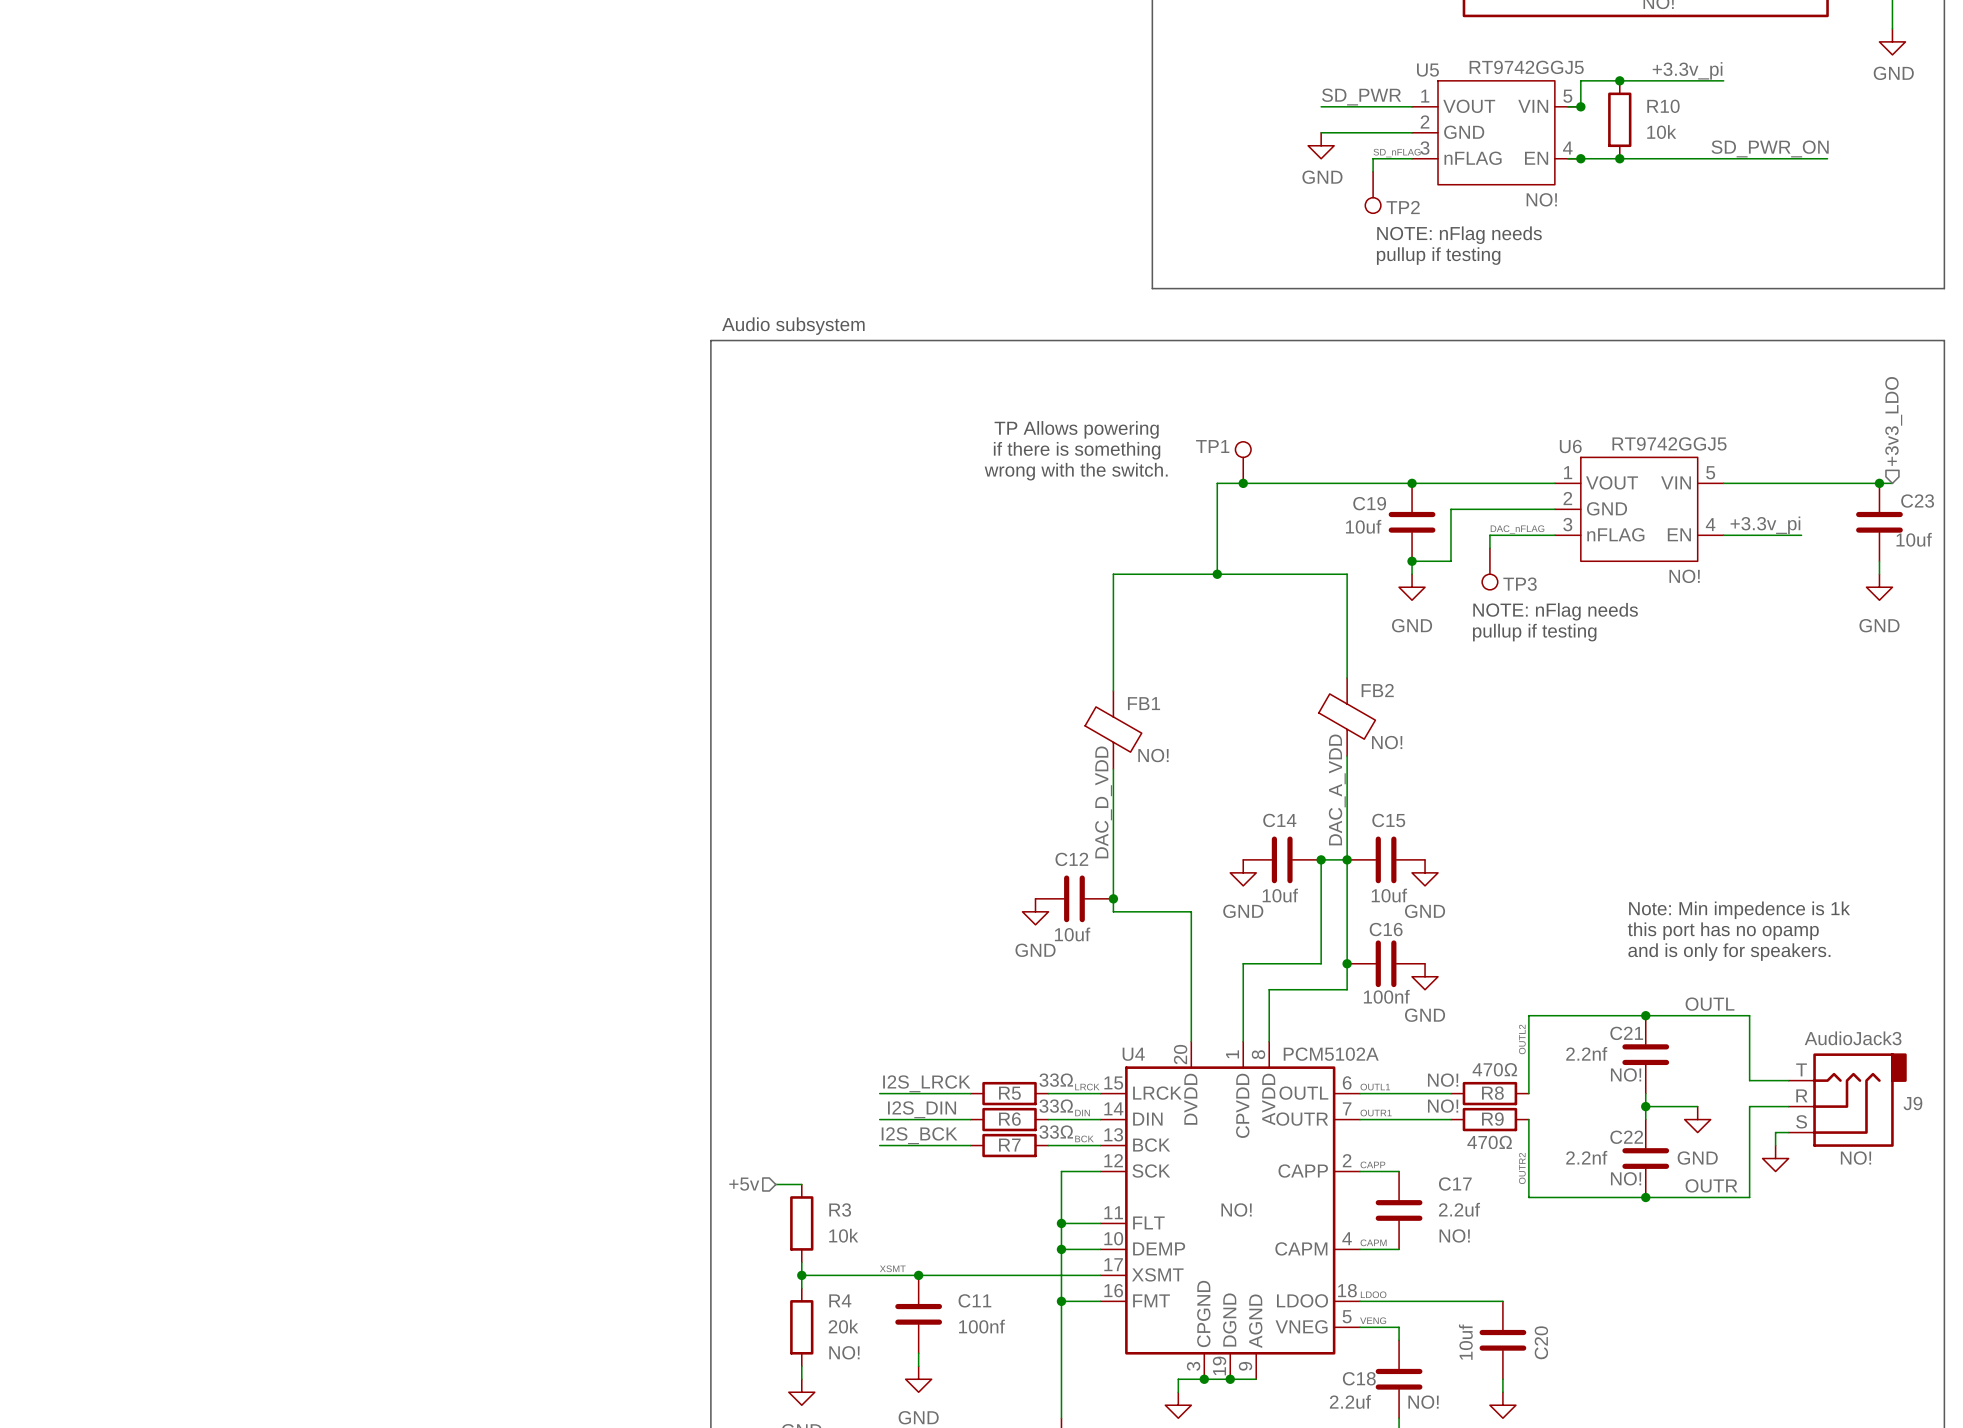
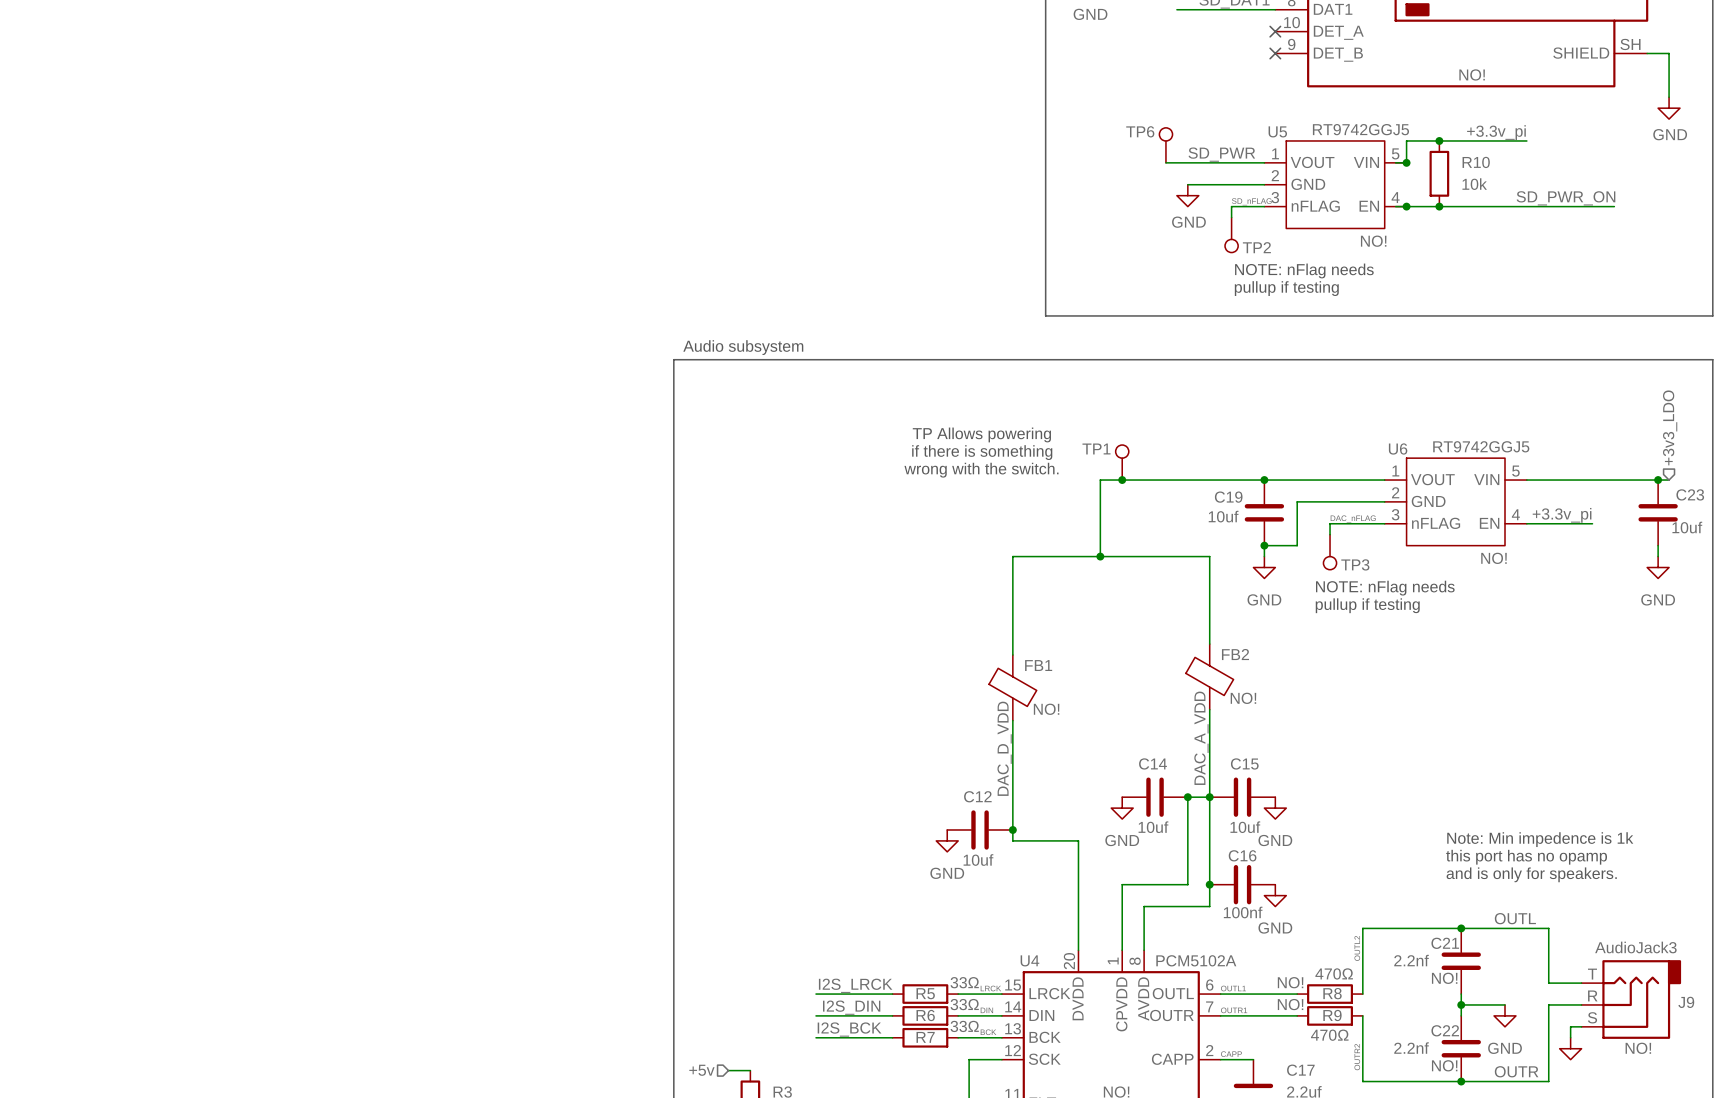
TP6: none -> (1165, 145)
wire: none -> (1165, 162) (1187, 162)

